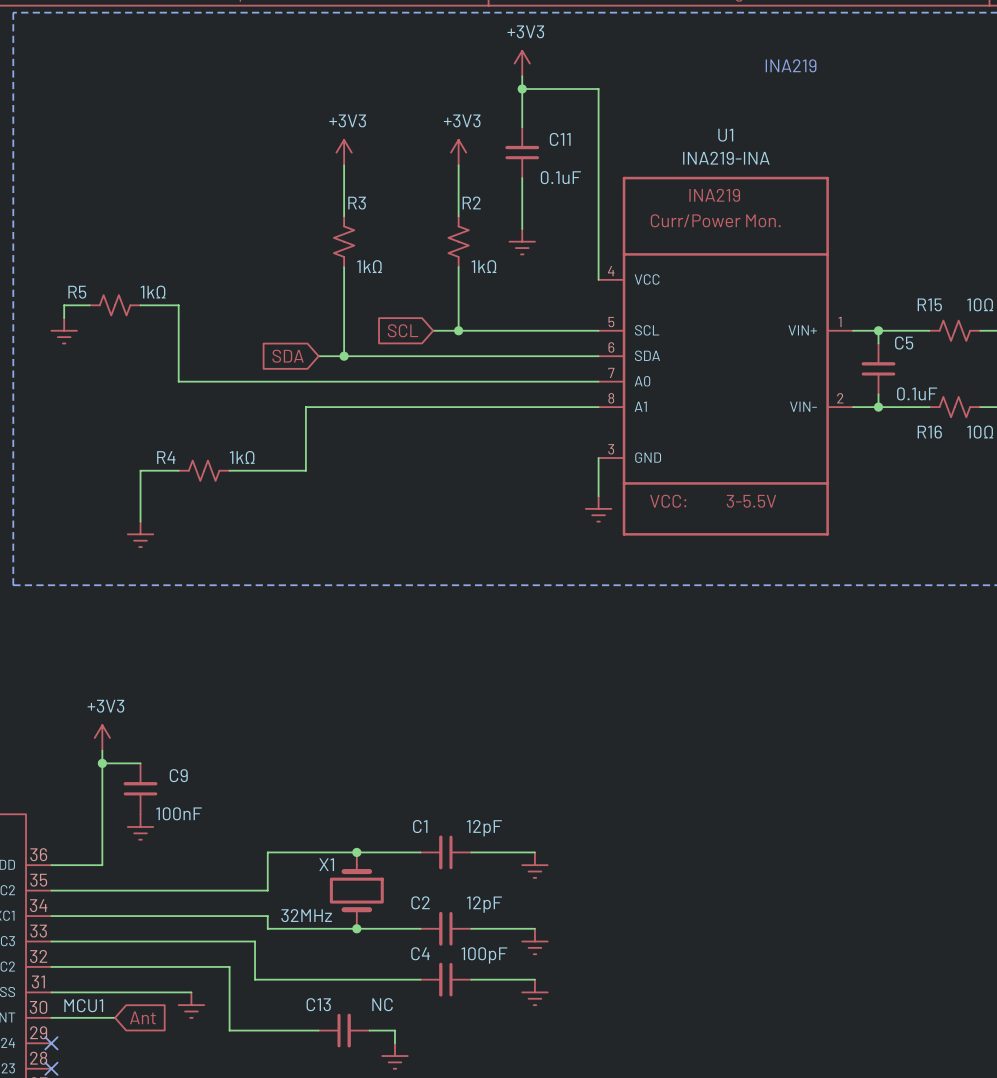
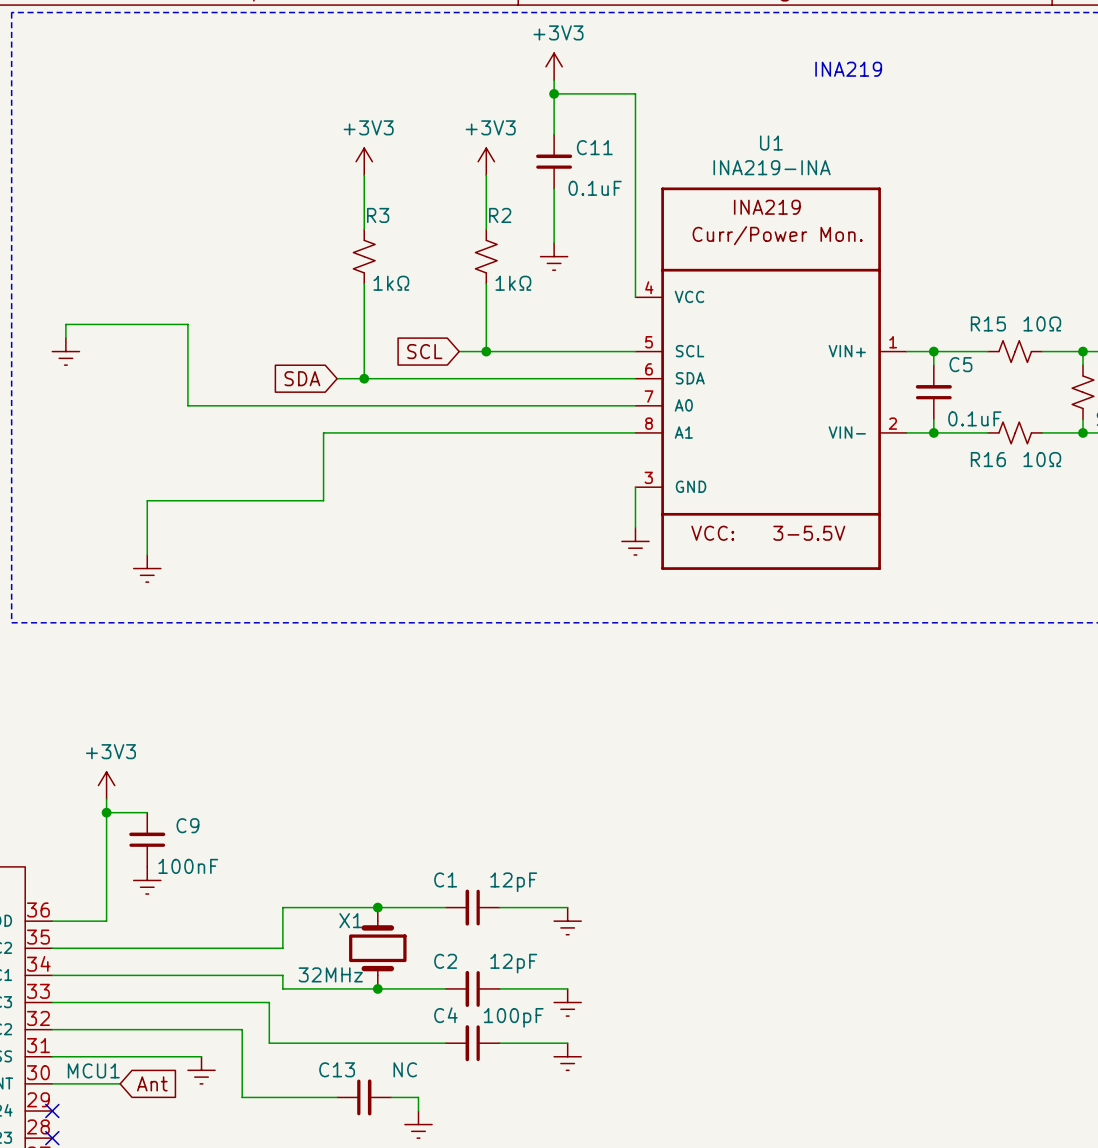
R5: 1kΩ (115, 305) -> none
R4: 1kΩ (204, 470) -> none

